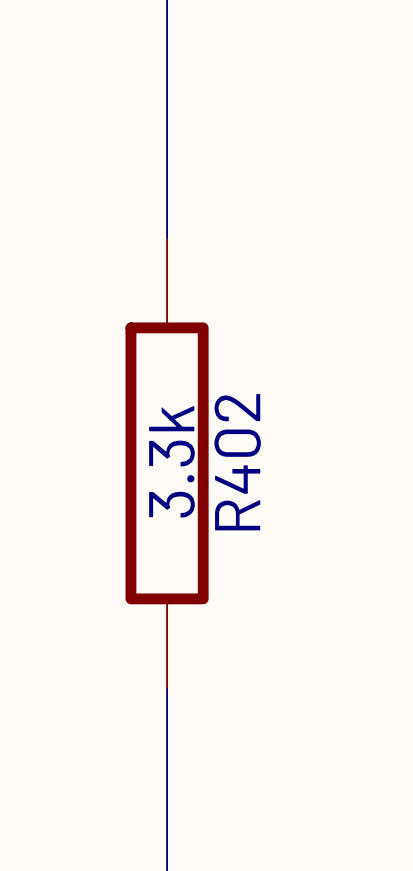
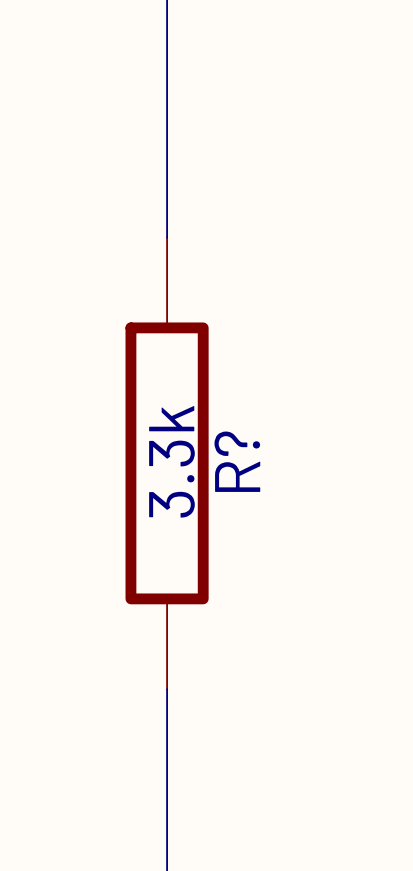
R402 name: R402 (237, 462) -> R? (237, 461)

